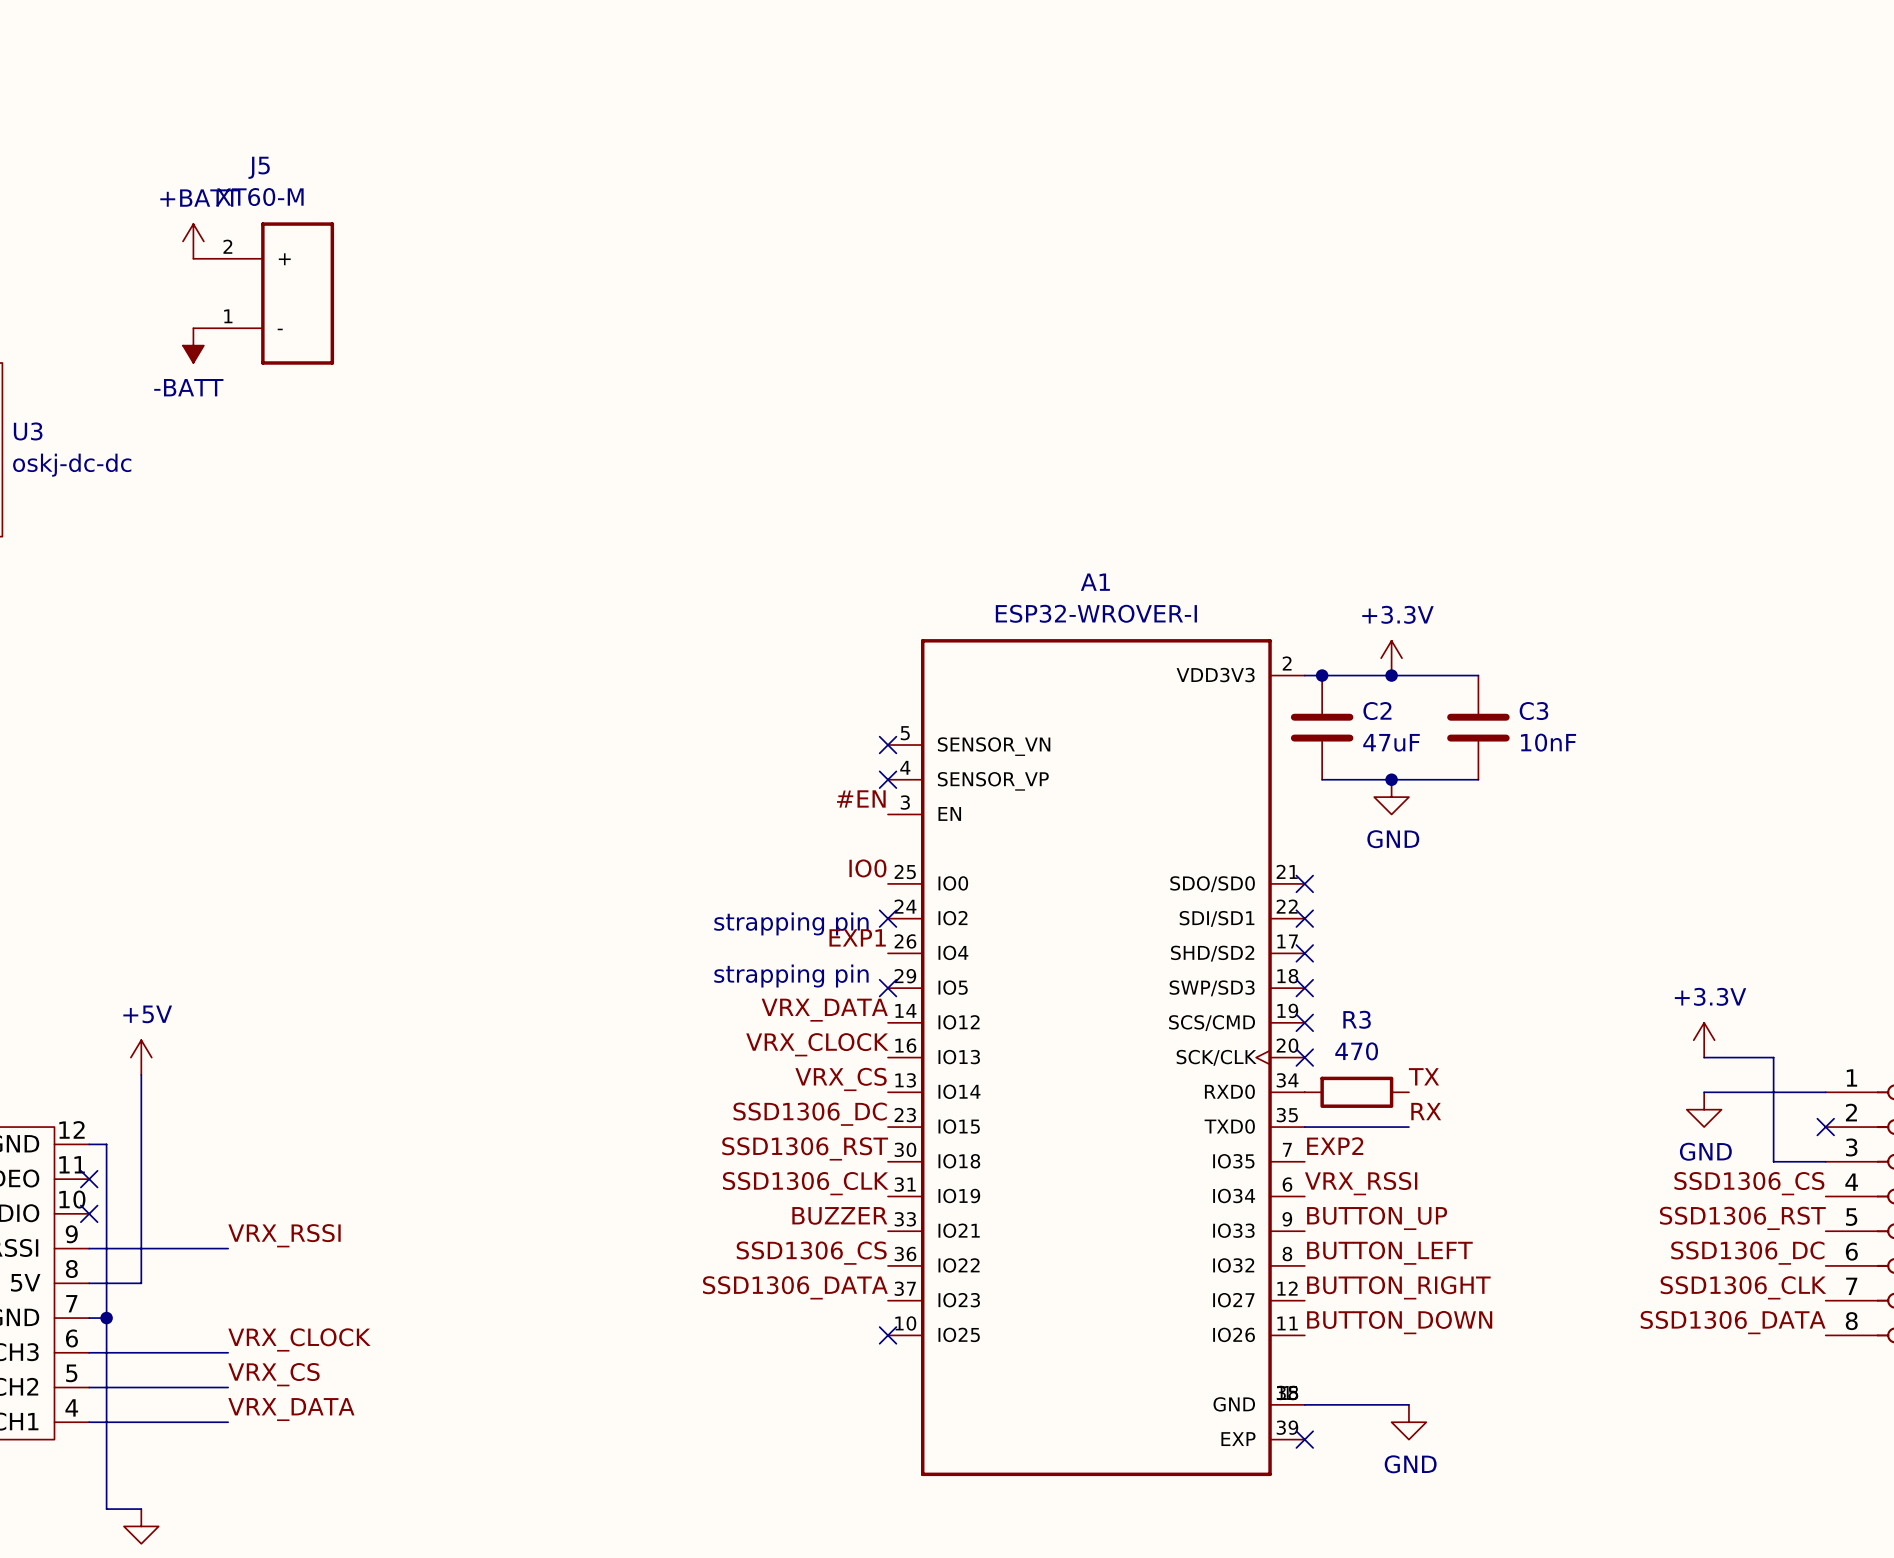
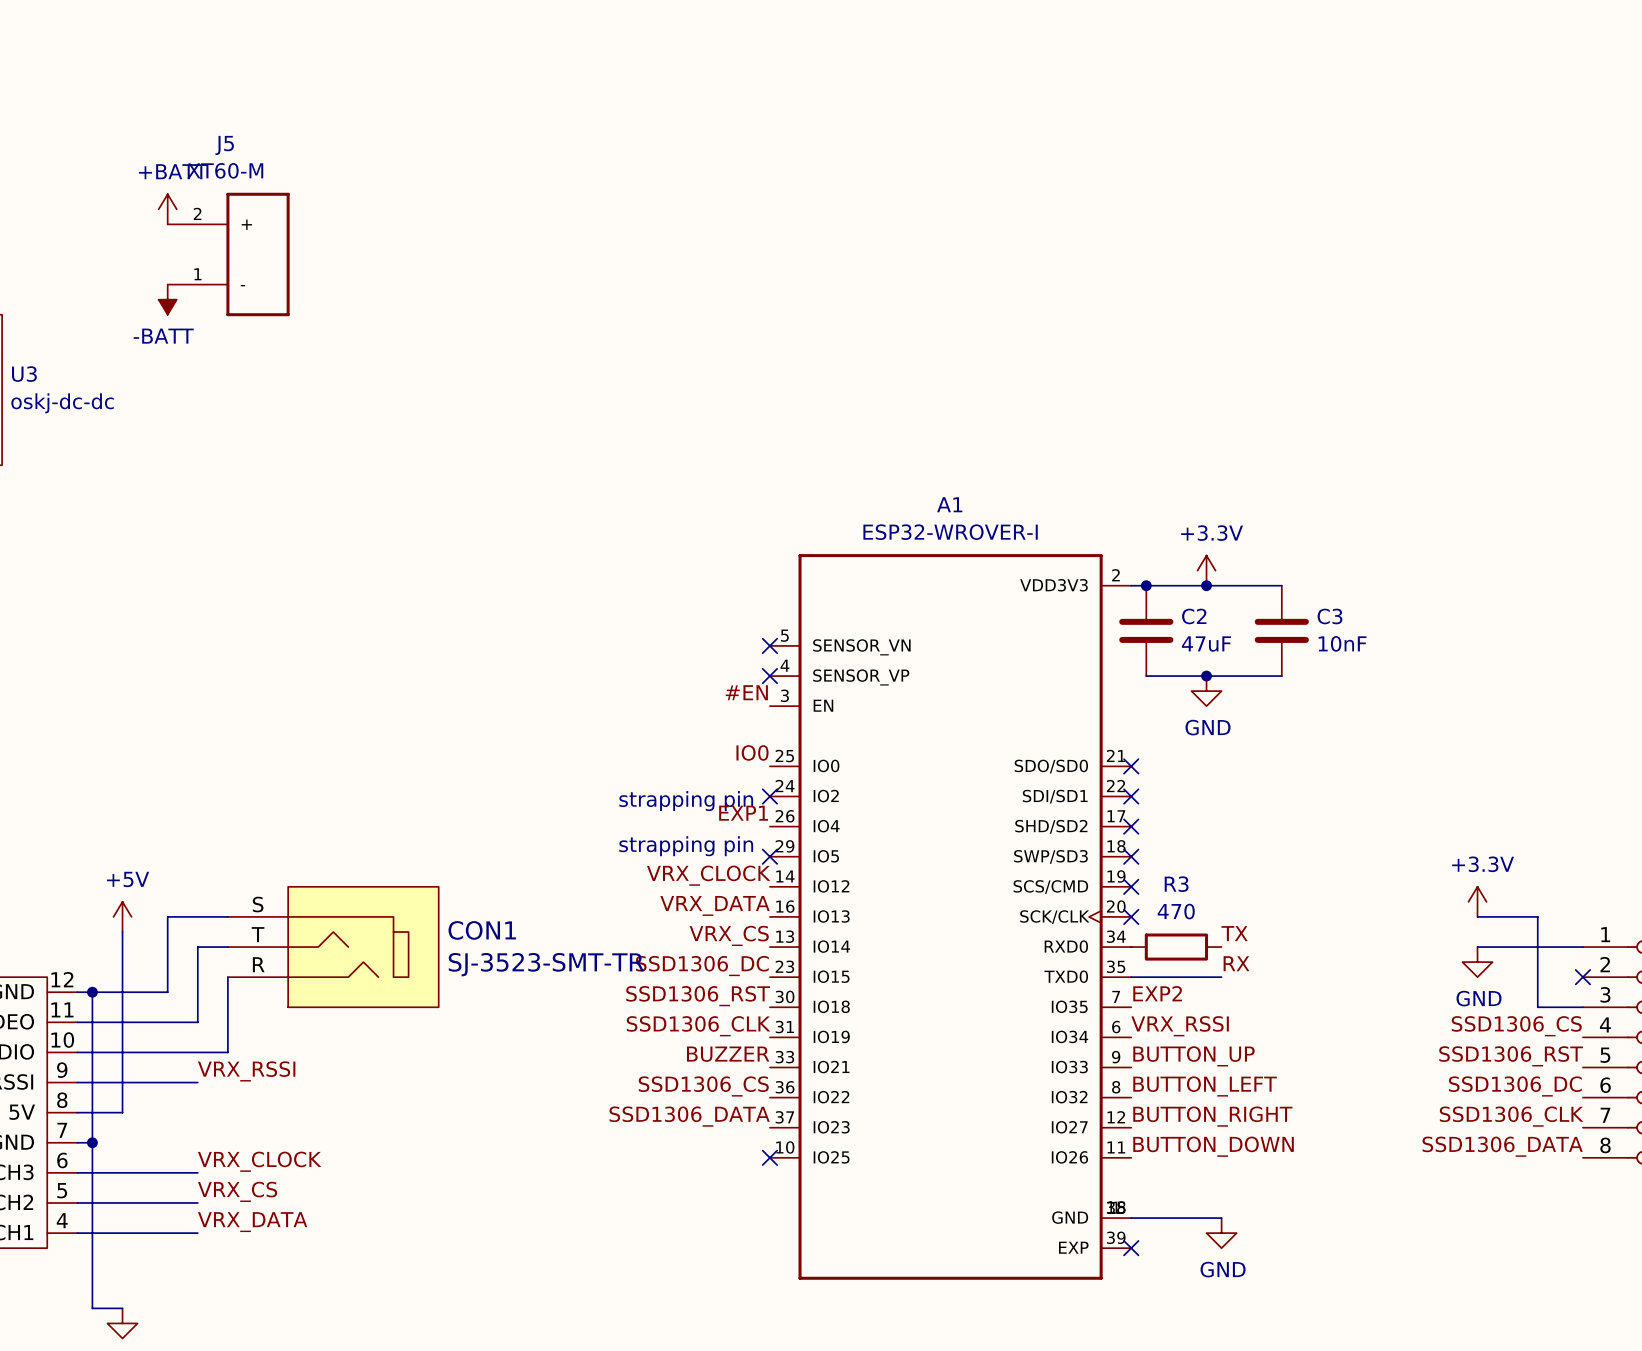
label: VRX_DATA (824, 1010) -> VRX_CLOCK (708, 875)
label: VRX_CLOCK (817, 1044) -> VRX_DATA (715, 905)
wire: none -> (227, 916) (167, 916) (167, 992) (92, 992)
wire: none -> (227, 947) (197, 947) (197, 1022) (77, 1022)
CON1: none -> SJ-3523-SMT-TR (333, 947)
wire: none -> (227, 977) (227, 1052) (77, 1052)
junction: none -> (92, 992)
no-connect mark: (89, 1179) -> none
no-connect mark: (89, 1213) -> none

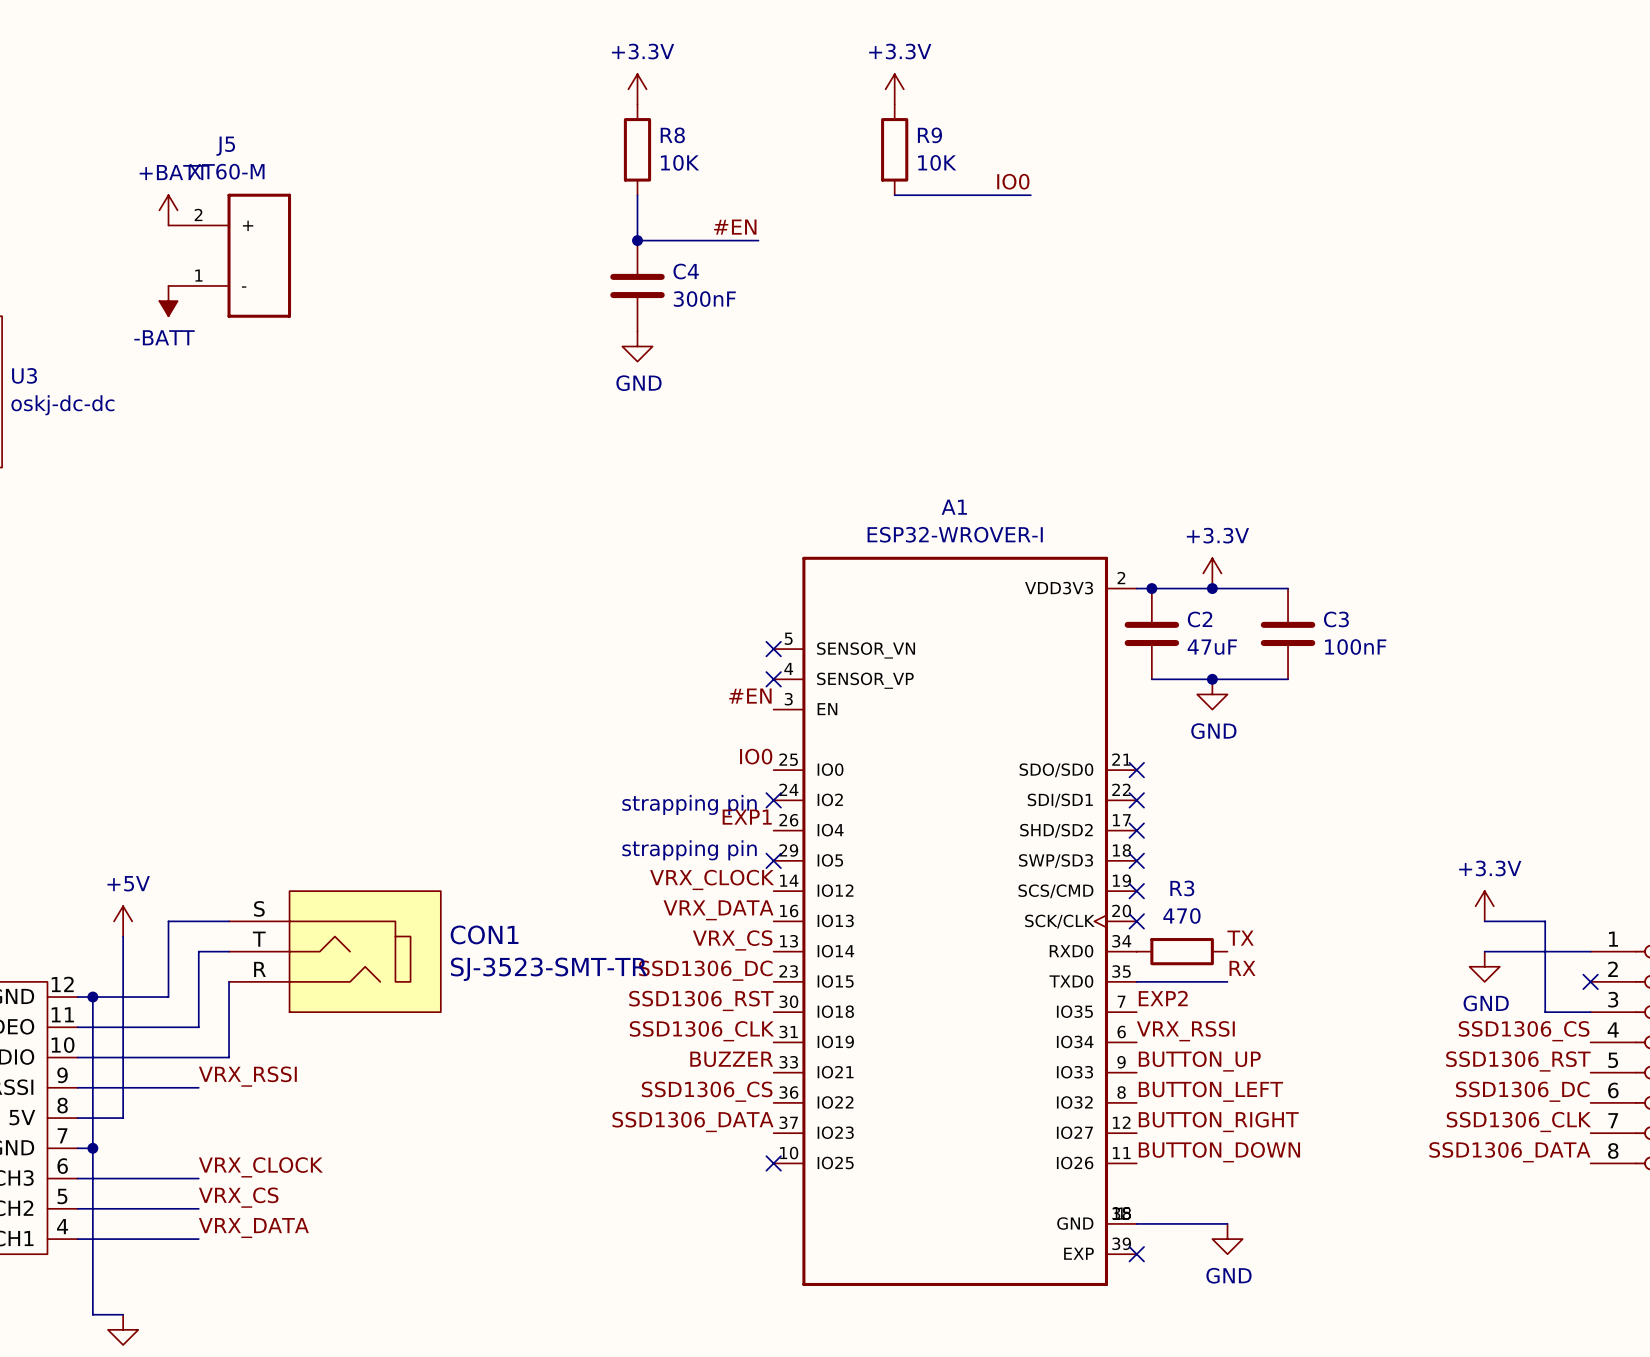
power symbol: none -> +3.3V (637, 89)
power symbol: none -> +3.3V (894, 89)
R8: none -> 10K (637, 149)
R9: none -> 10K (894, 149)
label: none -> IO0 (1013, 181)
wire: none -> (637, 195) (637, 240) (758, 240)
wire: none -> (894, 195) (1030, 195)
label: none -> #EN (735, 227)
junction: none -> (637, 240)
C4: none -> 300nF (637, 285)
power symbol: none -> GND (637, 346)
C3 value: 10nF (1342, 643) -> 100nF (1355, 647)

